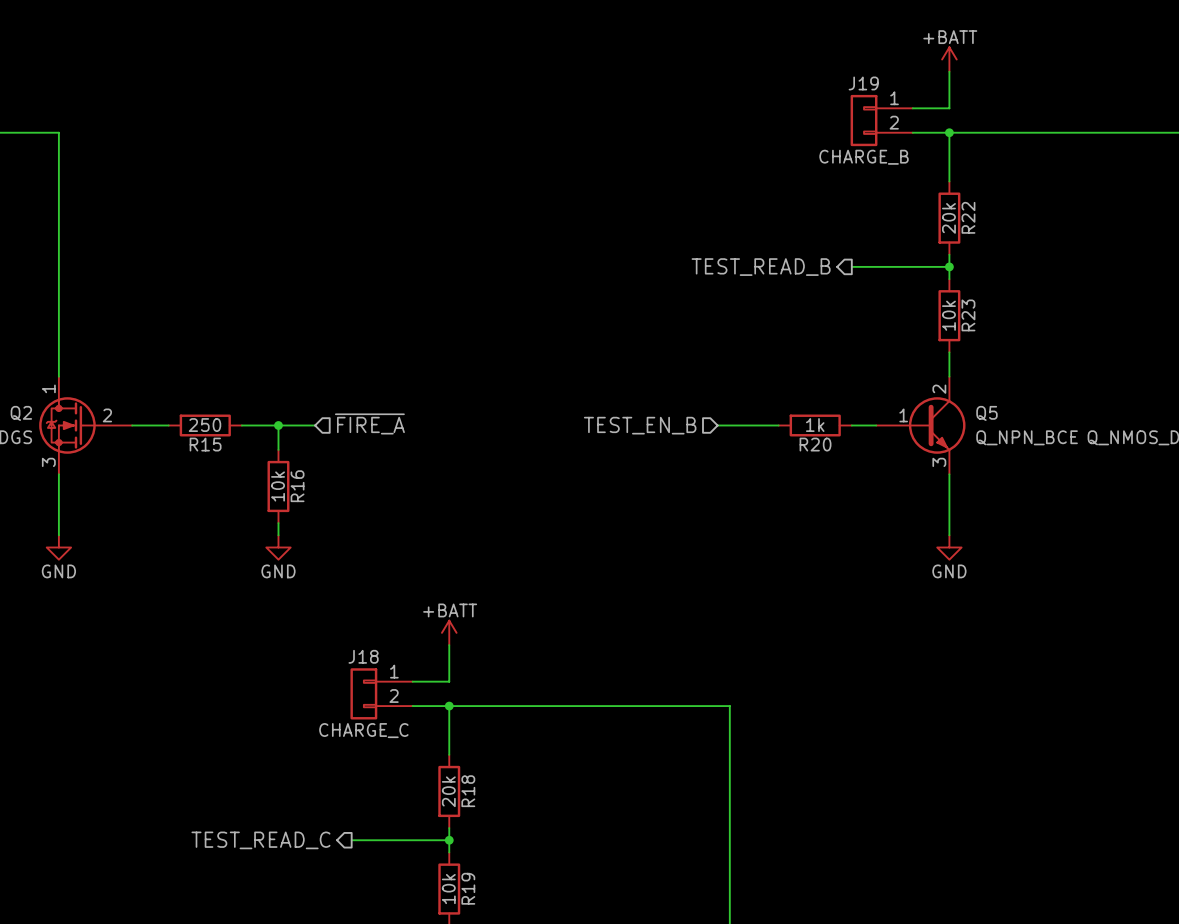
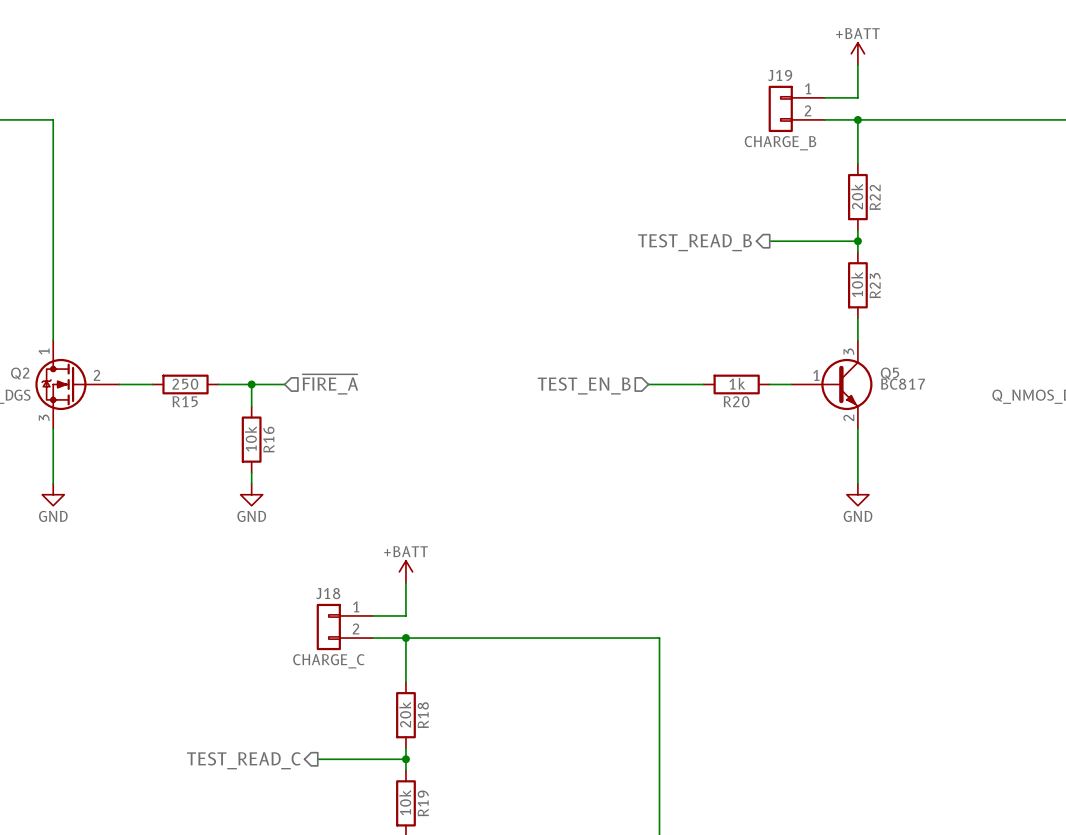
Q5 pin number: 2 (939, 389) -> 3 (848, 351)
Q5 value: Q_NPN_BCE (1027, 437) -> BC817 (903, 384)
Q5 pin number: 3 (939, 462) -> 2 (848, 417)

